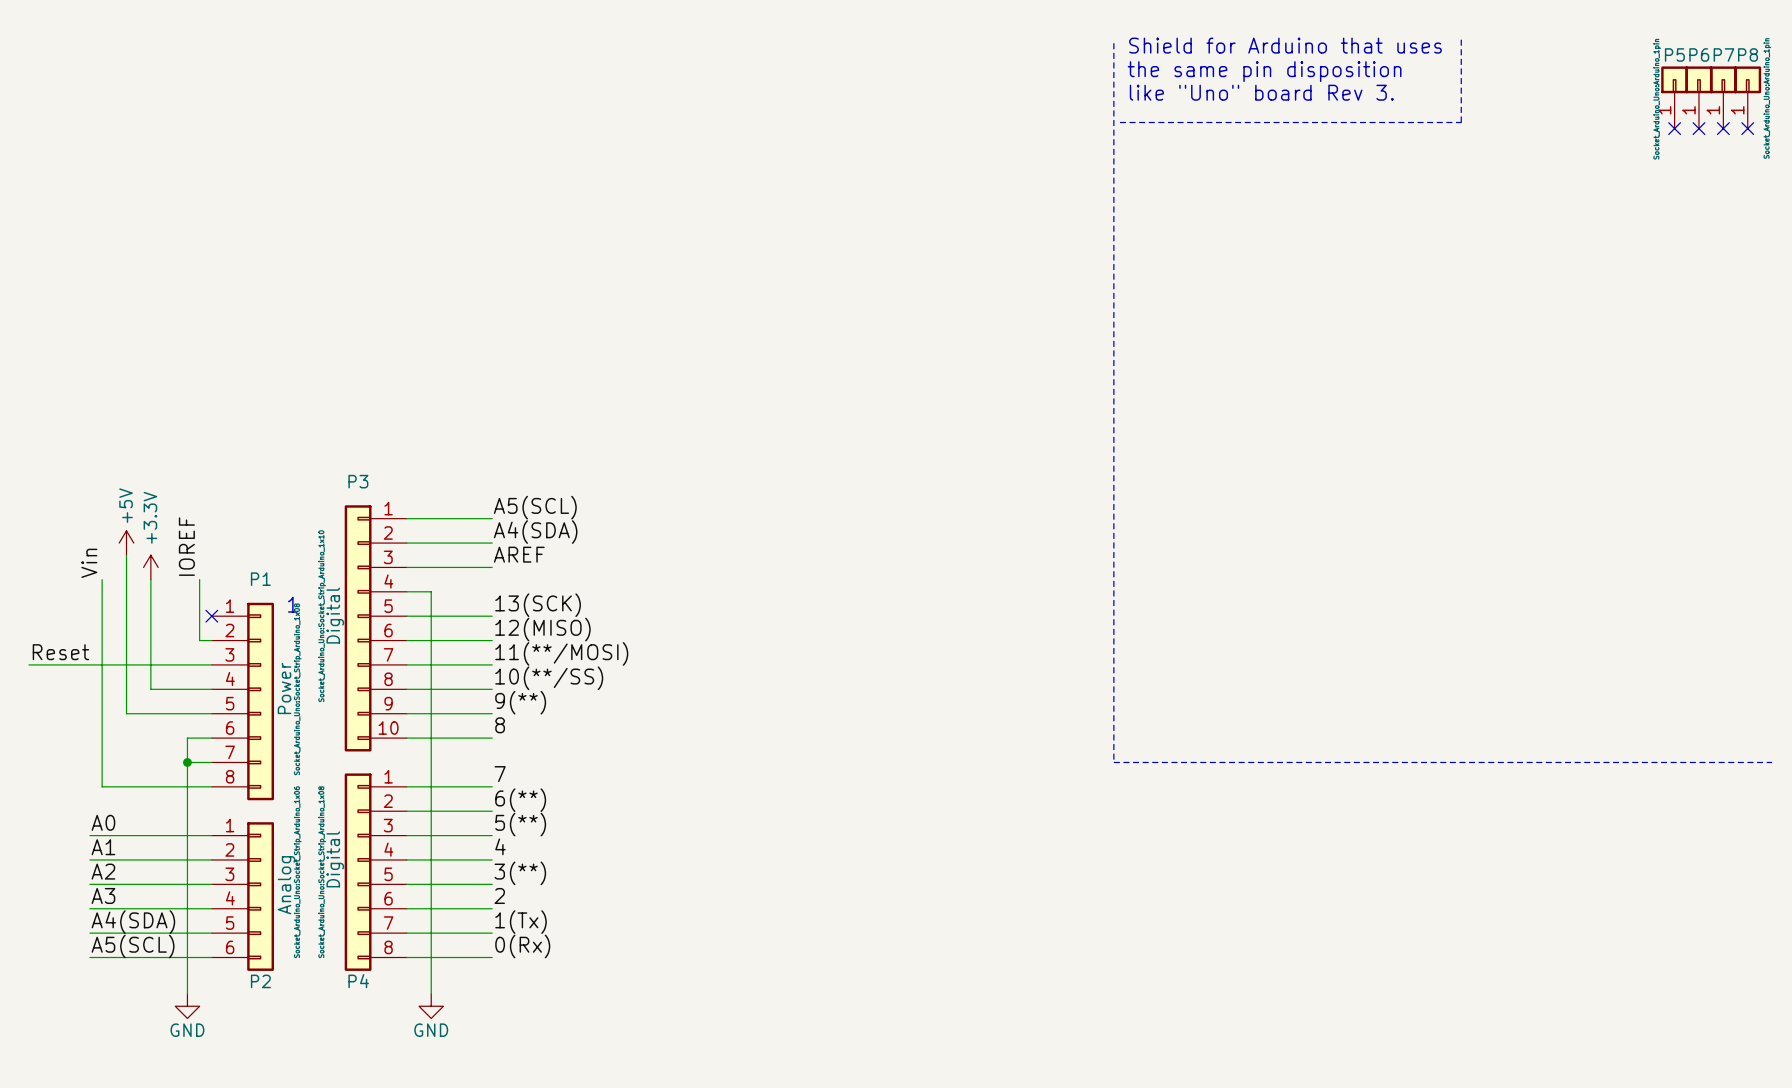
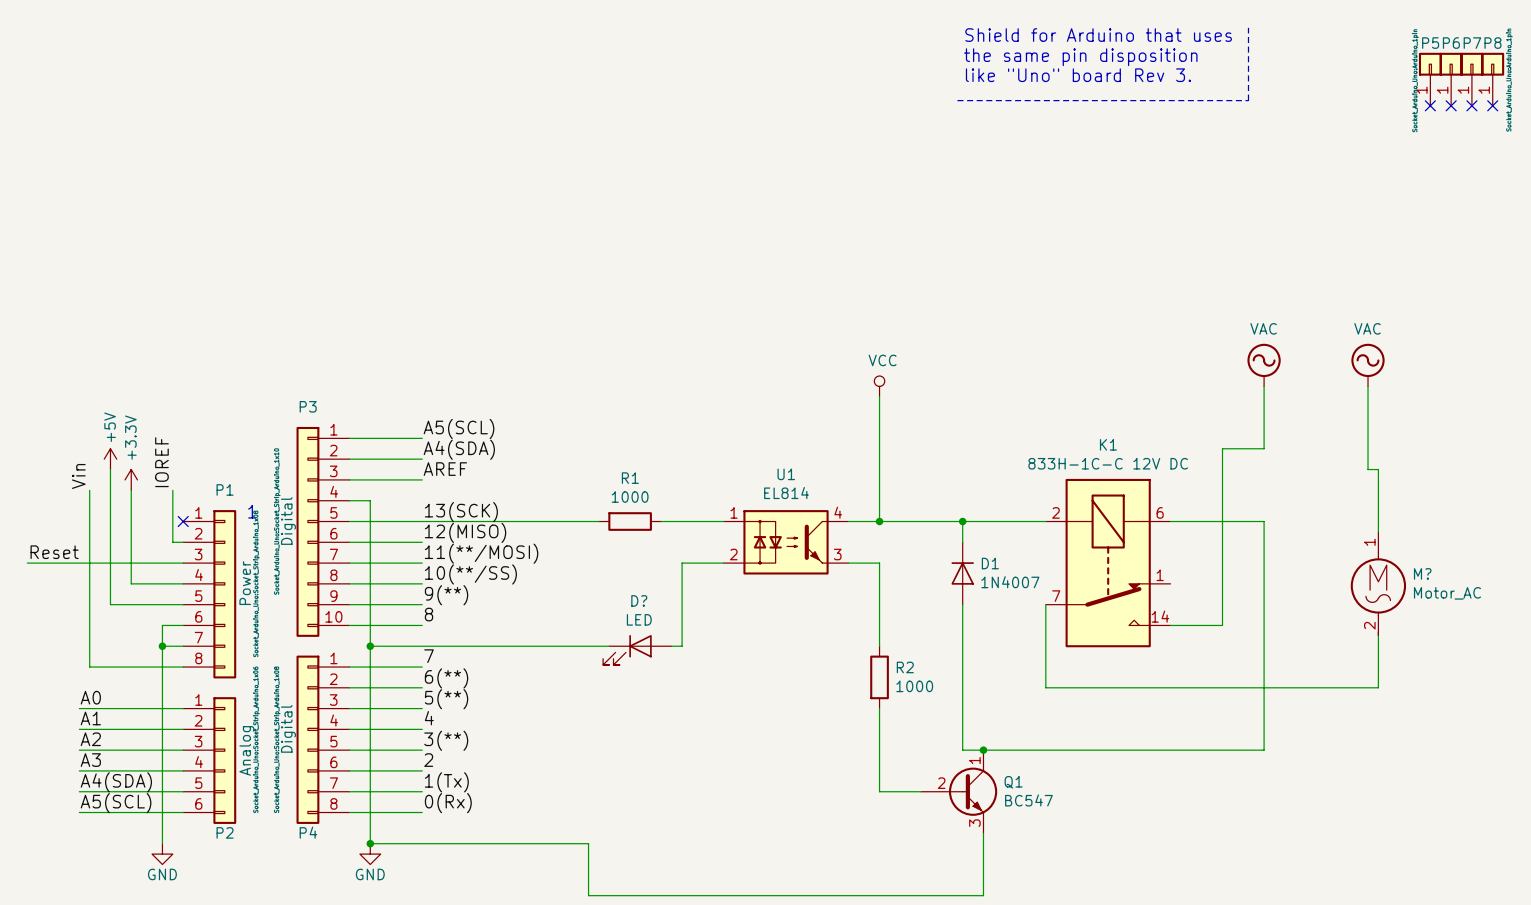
line: (1113, 43) (1113, 762) (1772, 762) -> none
power symbol: none -> VAC (1264, 365)
power symbol: none -> VAC (1368, 365)
power symbol: none -> VCC (879, 386)
wire: none -> (1264, 386) (1264, 448) (1222, 448) (1222, 625) (1170, 625)
wire: none -> (1368, 386) (1368, 469) (1378, 469) (1378, 531)
wire: none -> (879, 396) (879, 521)
wire: none -> (422, 521) (598, 521)
R1: none -> 1000 (630, 521)
wire: none -> (661, 521) (723, 521)
wire: none -> (848, 521) (1045, 521)
junction: none -> (879, 521)
wire: none -> (962, 521) (962, 542)
junction: none -> (962, 521)
wire: none -> (1170, 521) (1264, 521) (1264, 750) (962, 750) (962, 604)
U1: none -> EL814 (786, 542)
wire: none -> (723, 563) (682, 563) (682, 646) (671, 646)
wire: none -> (848, 563) (879, 563) (879, 646)
K1: none -> 833H-1C-C 12V DC (1108, 563)
D1: none -> 1N4007 (962, 573)
M?: none -> Motor_AC (1378, 583)
wire: none -> (1045, 604) (1045, 687) (1378, 687) (1378, 635)
wire: none -> (370, 646) (609, 646)
junction: none -> (370, 646)
D?: none -> LED (637, 649)
R2: none -> 1000 (879, 677)
wire: none -> (879, 708) (879, 791) (921, 791)
junction: none -> (983, 750)
Q1: none -> BC547 (959, 791)
wire: none -> (983, 833) (983, 895) (588, 895) (588, 843) (370, 843)
junction: none -> (370, 843)

